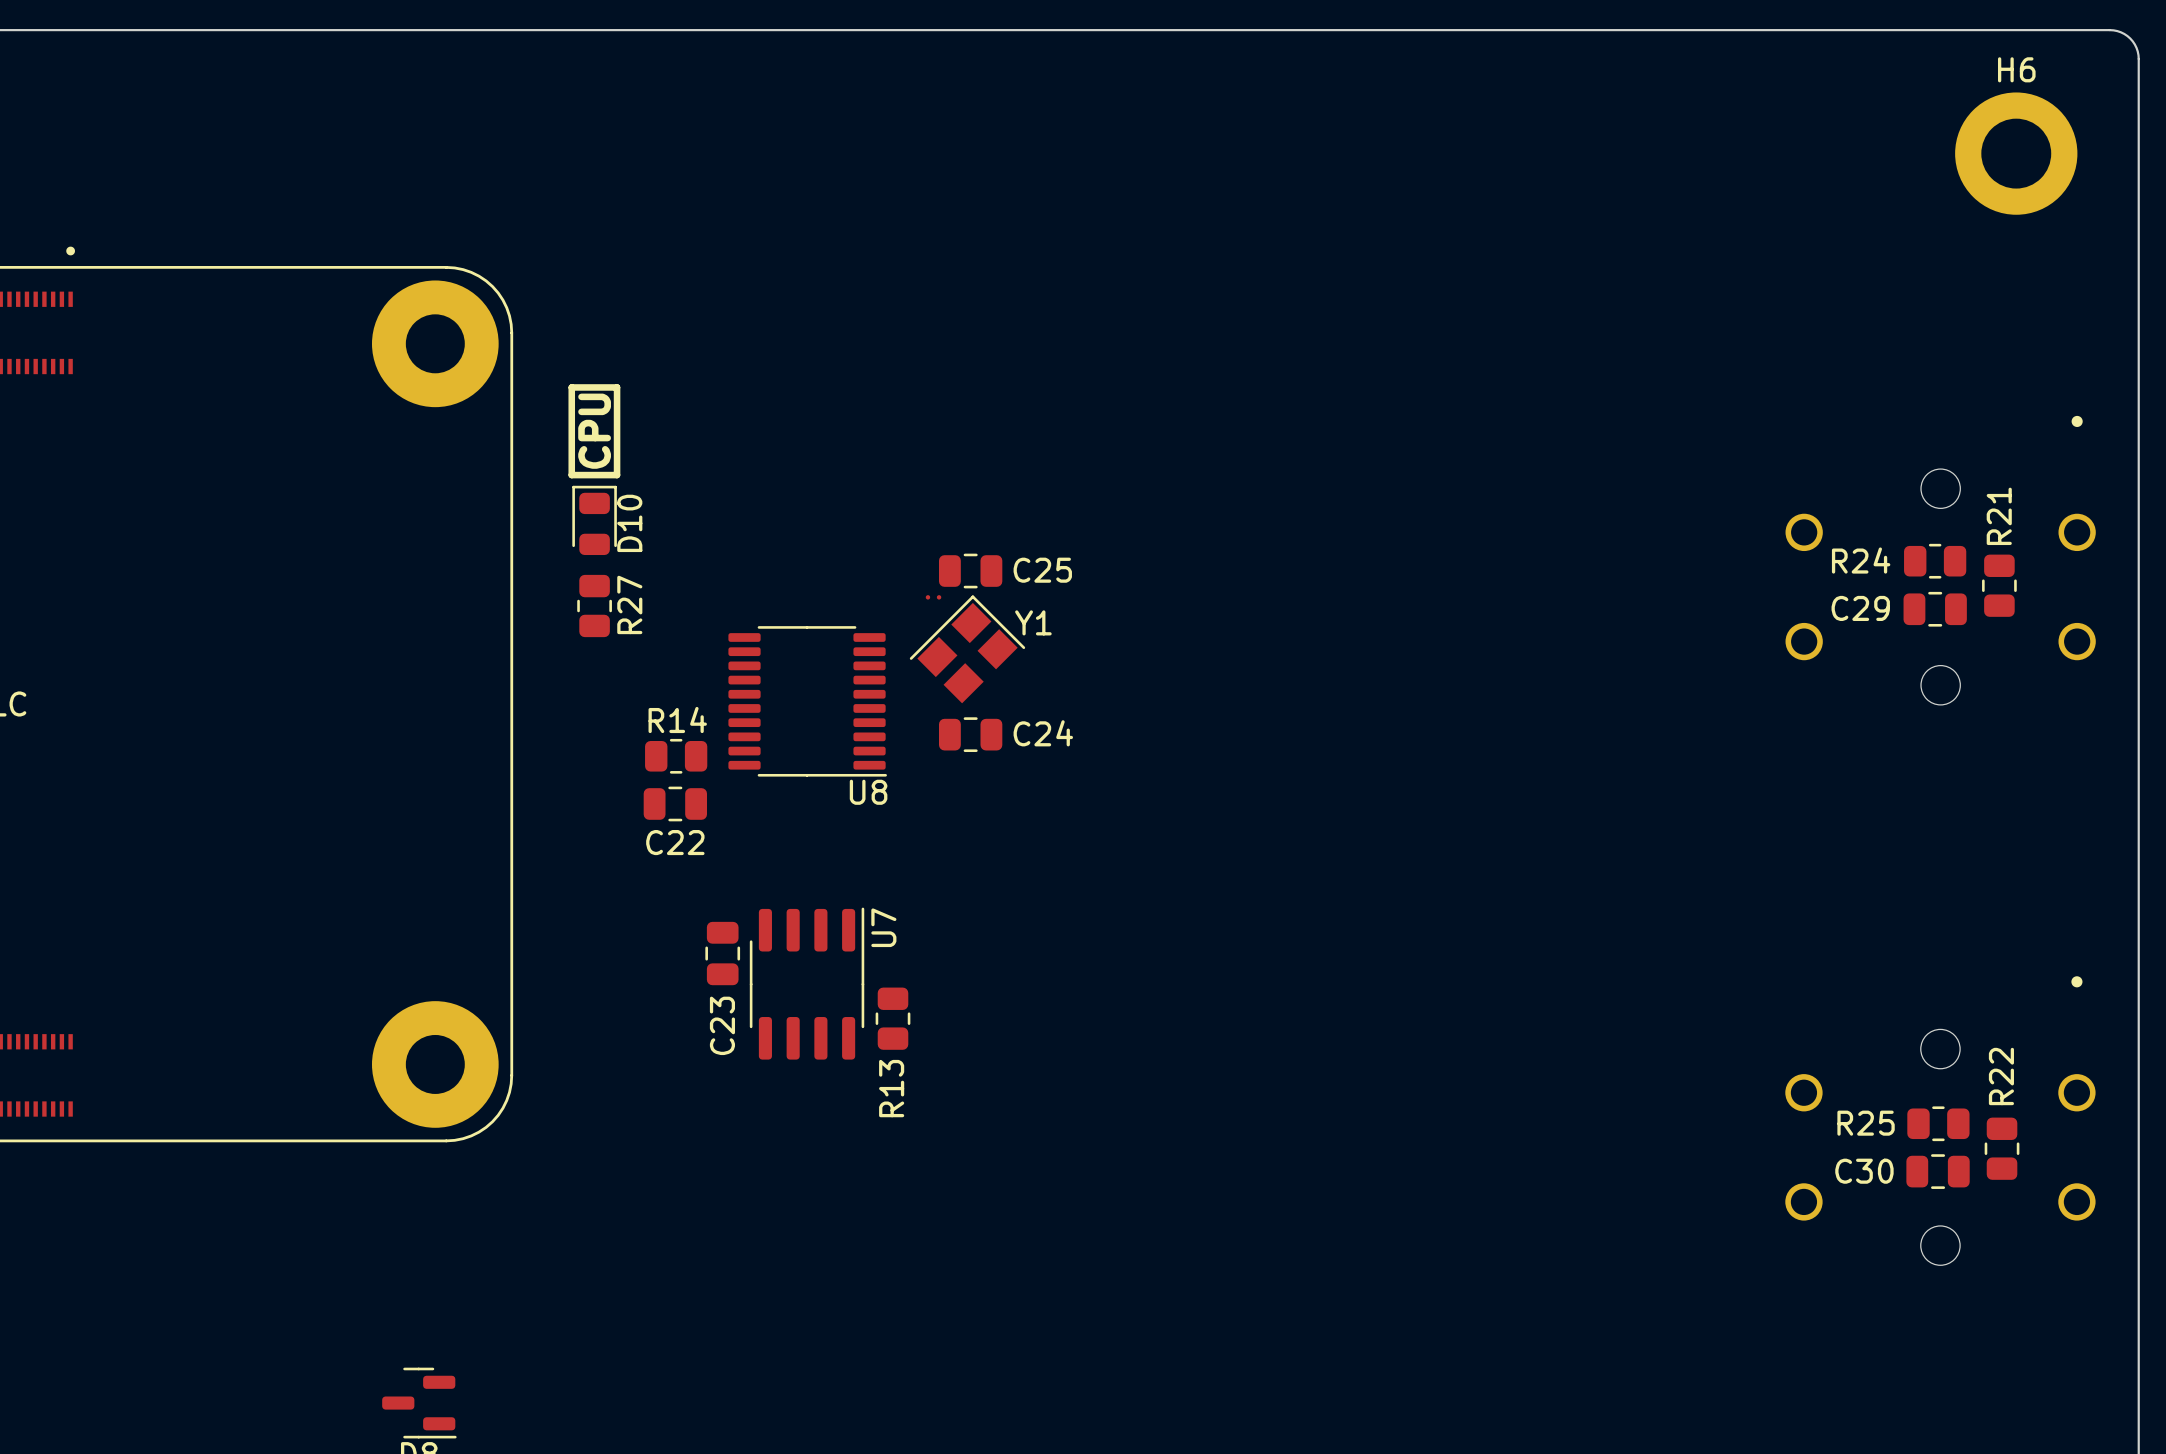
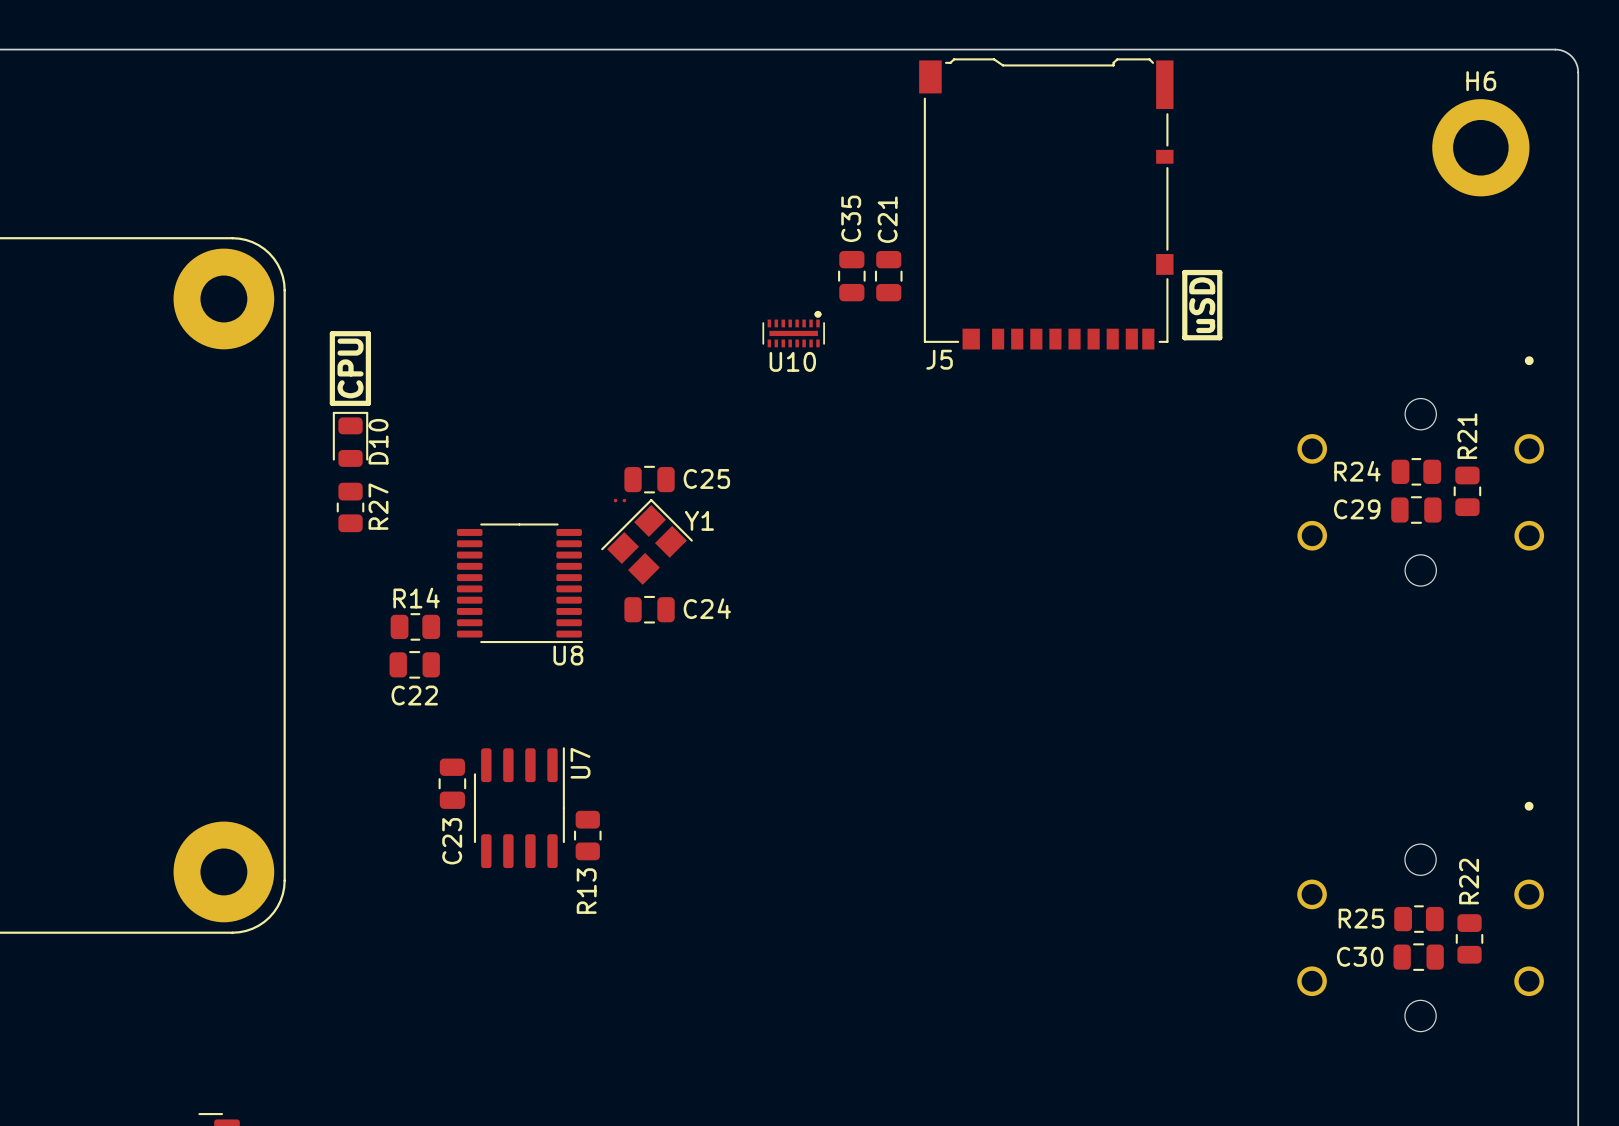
J5: none -> (1046, 203)
line: none -> (1184, 272) (1219, 272) (1219, 337) (1184, 337) (1184, 272)
C35: none -> (851, 276)
C21: none -> (888, 276)
text: none -> uSD (1202, 305)
U10: none -> (793, 329)

